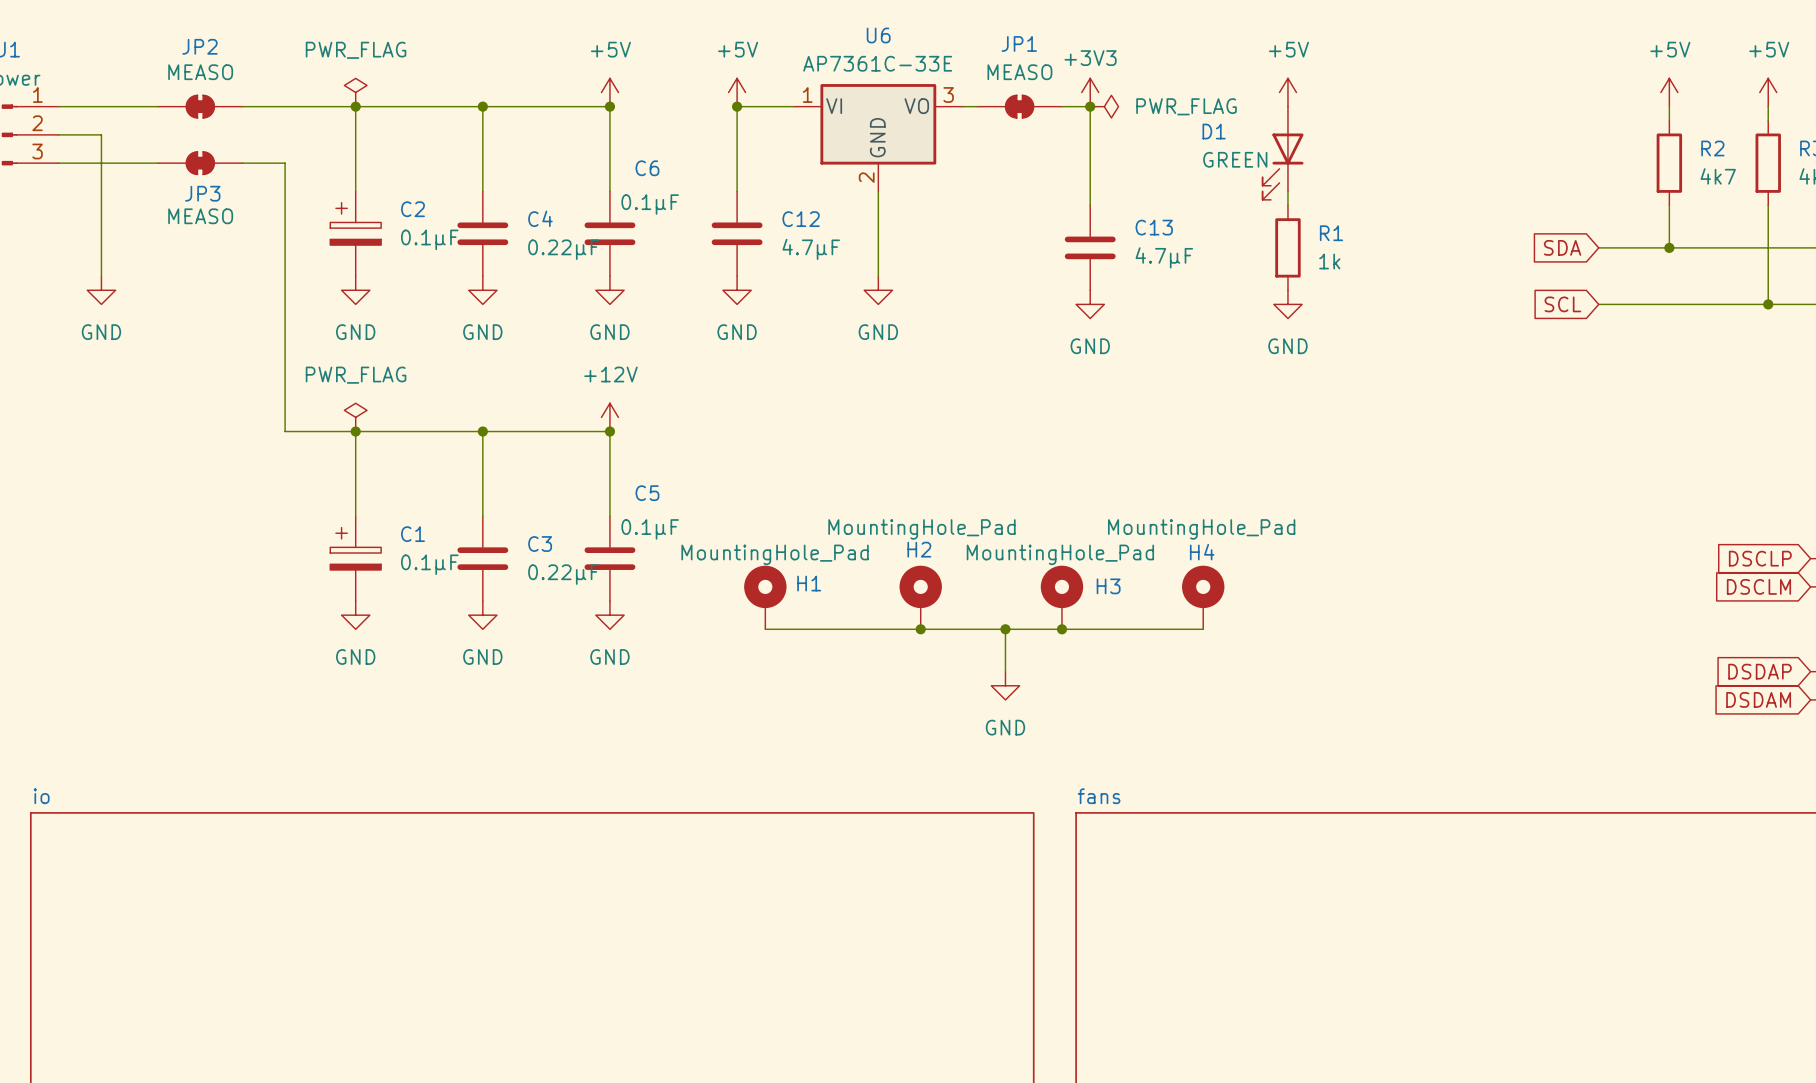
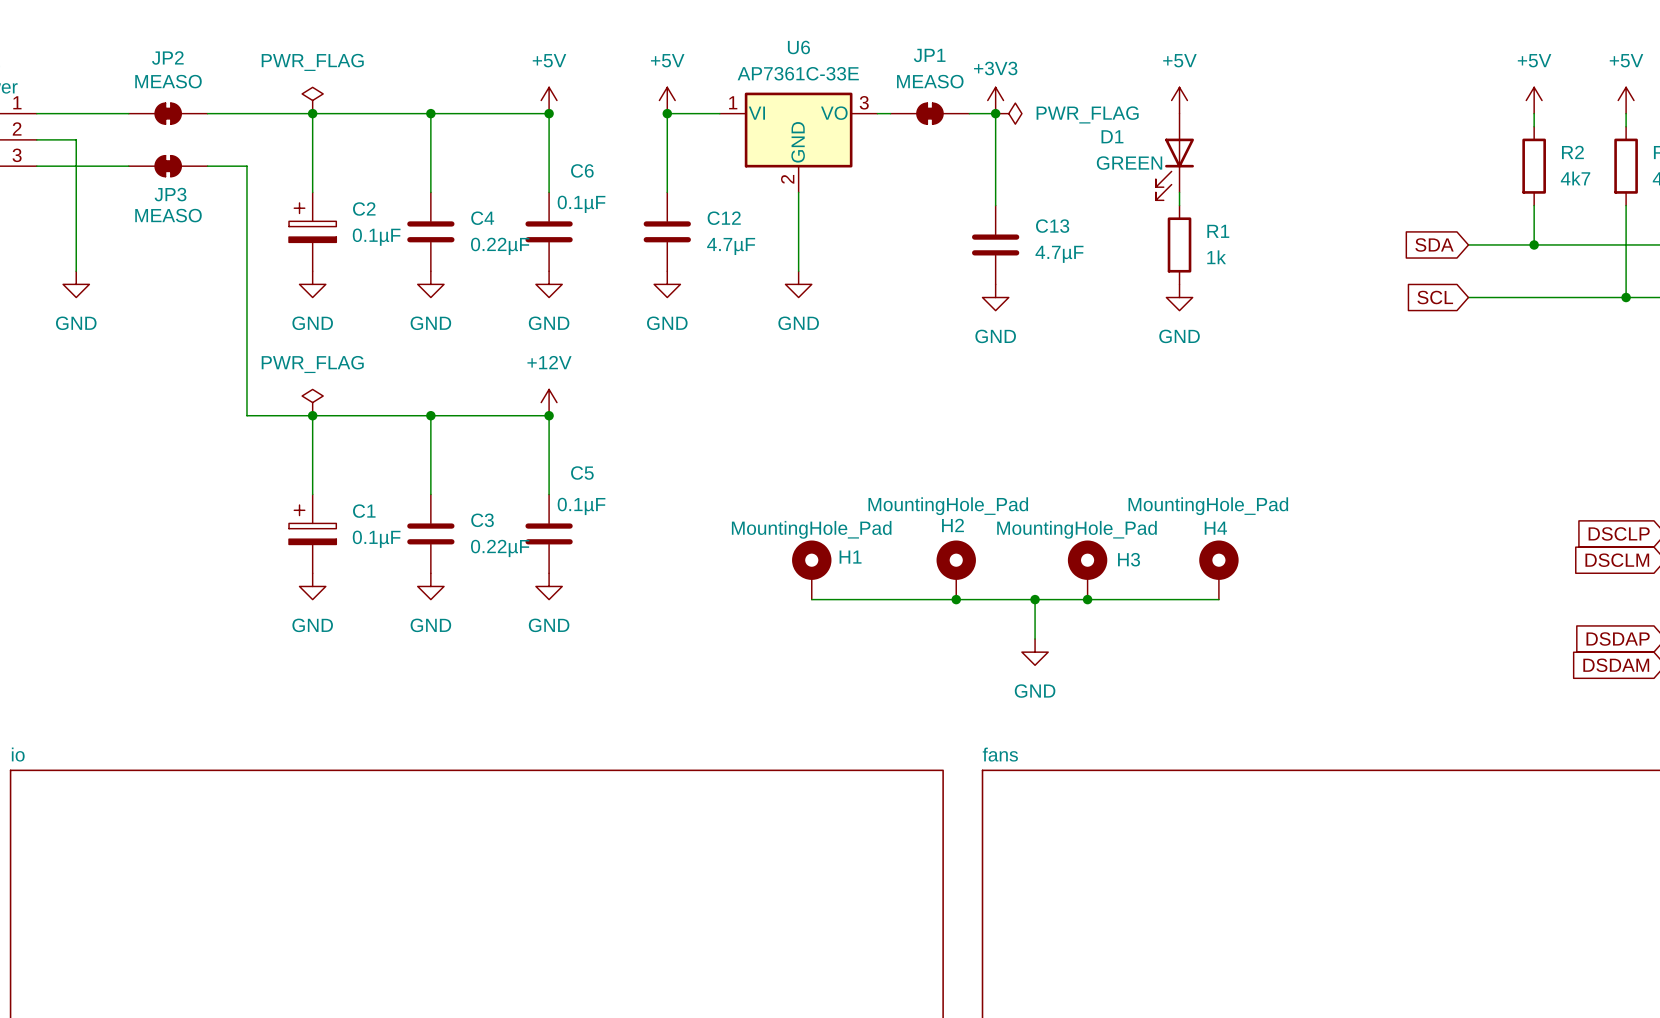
H1 position: (765, 597) -> (811, 570)
H2 position: (920, 597) -> (956, 570)
H3 position: (1061, 597) -> (1087, 570)
H4 position: (1203, 597) -> (1218, 570)
wire: (765, 629) (892, 629) -> none
junction: (920, 629) -> none
wire: (1005, 629) (1005, 671) -> (1035, 599) (1035, 639)
junction: (1005, 629) -> none
junction position: (1061, 629) -> (956, 599)
junction: none -> (1035, 599)
junction: none -> (1087, 599)
wire: none -> (1100, 599) (1218, 599)
power symbol position: GND (1005, 685) -> GND (1035, 652)

